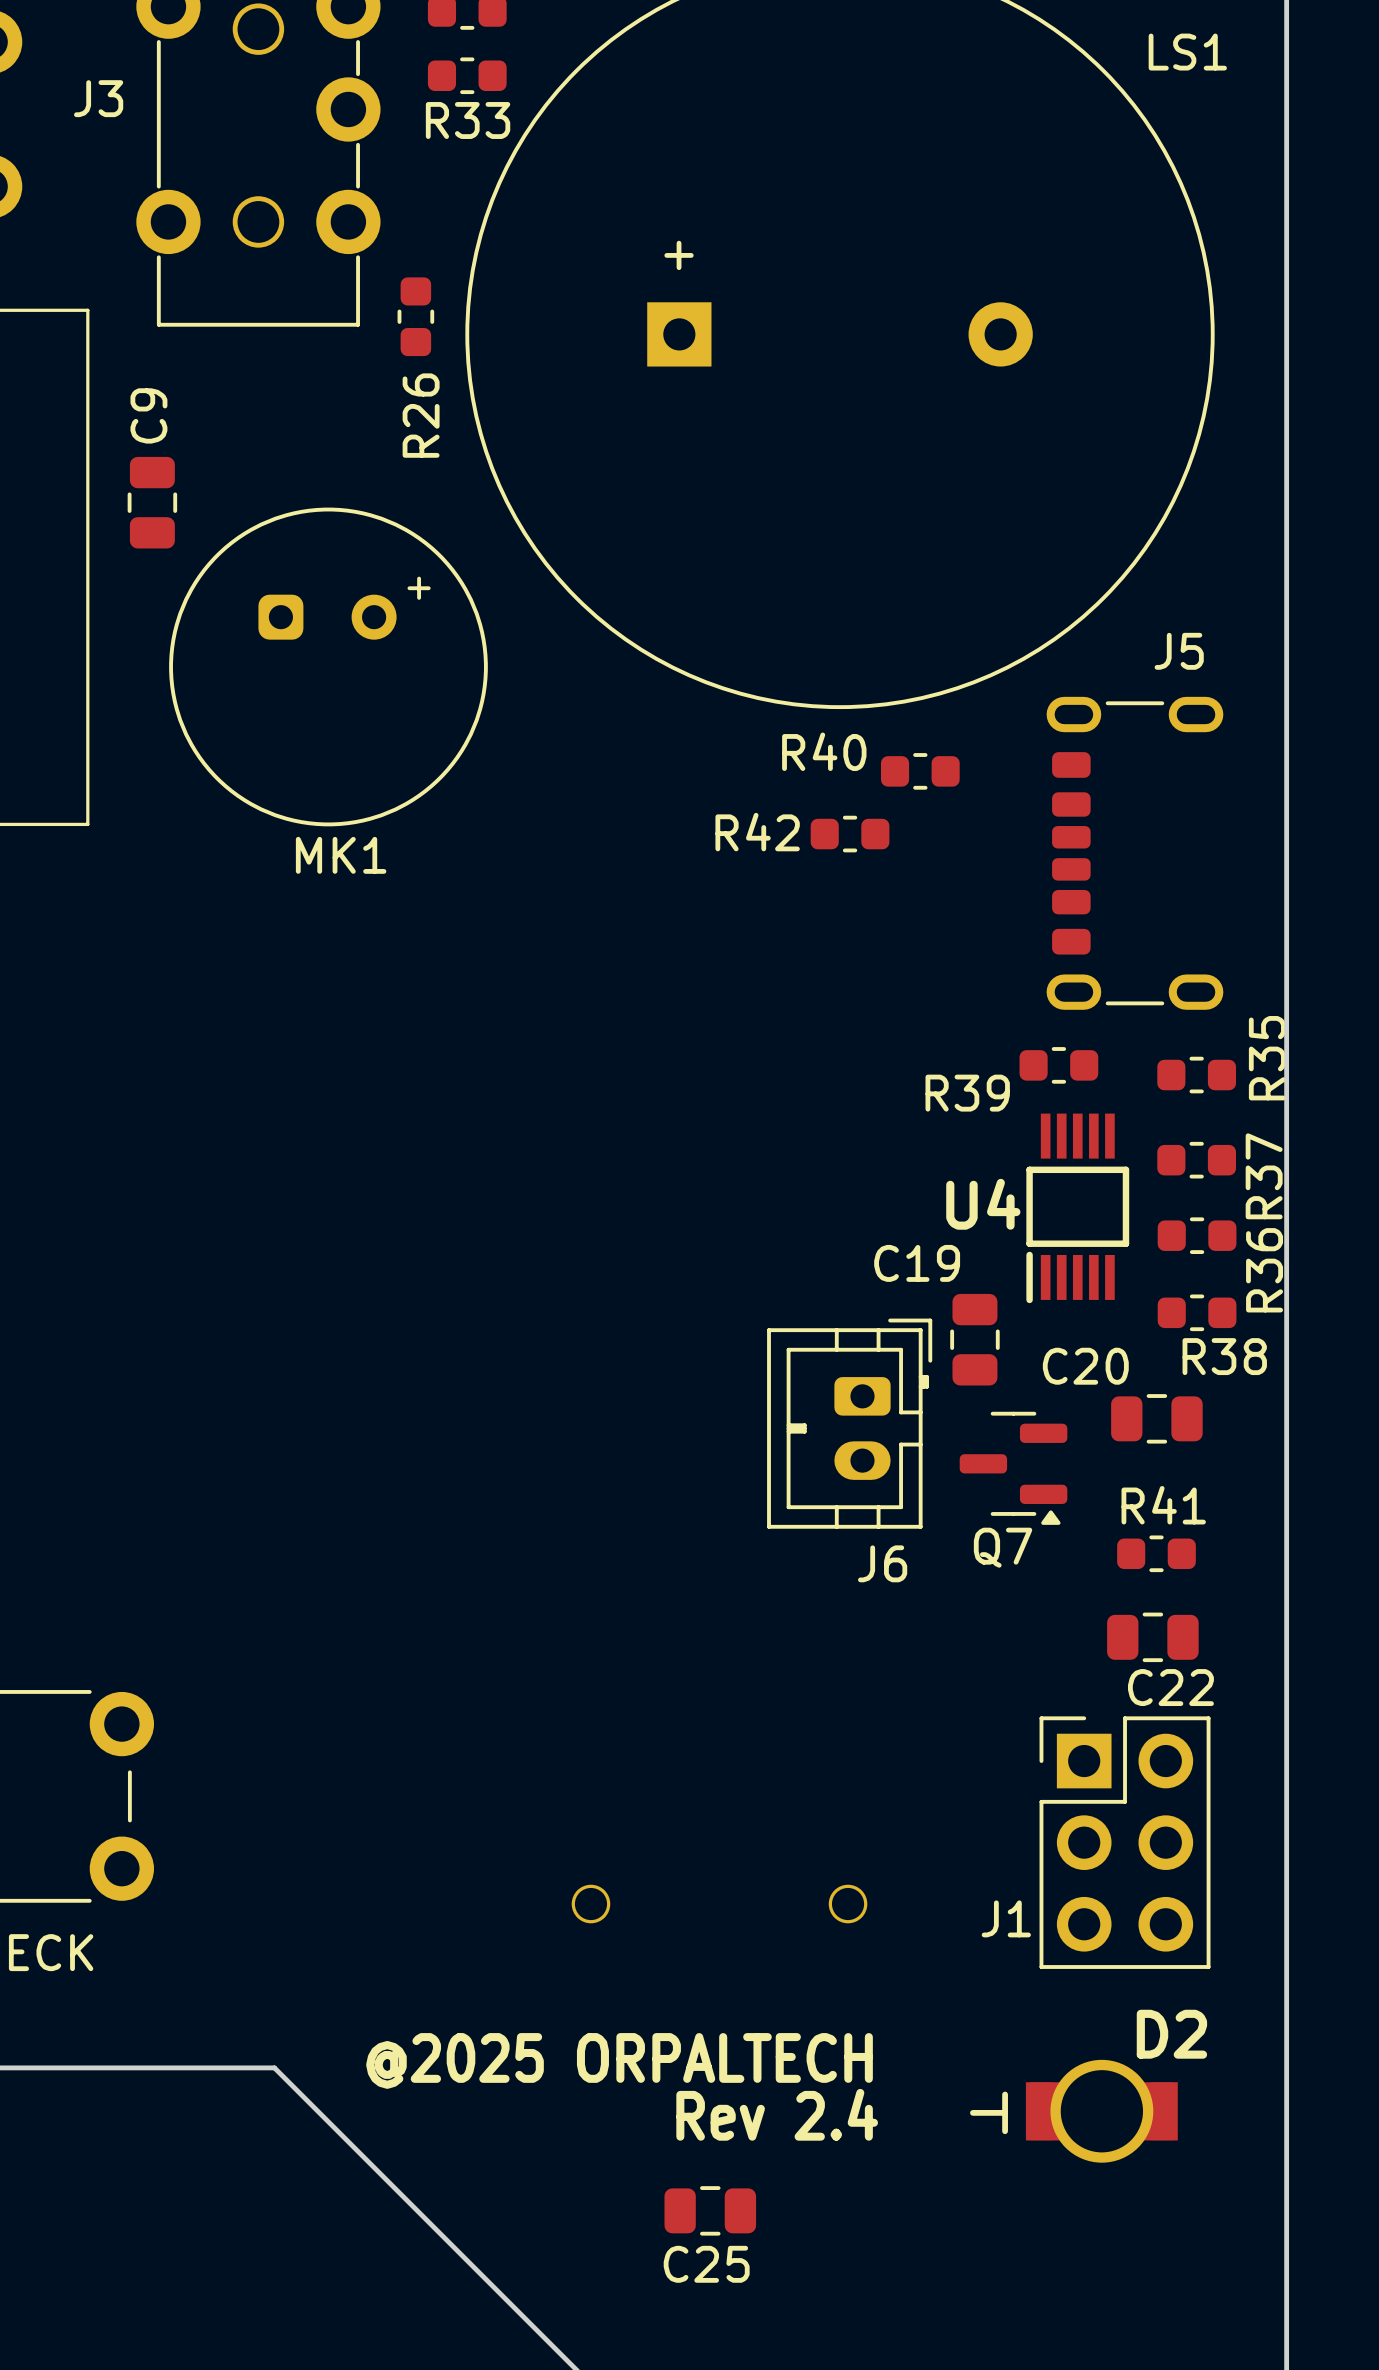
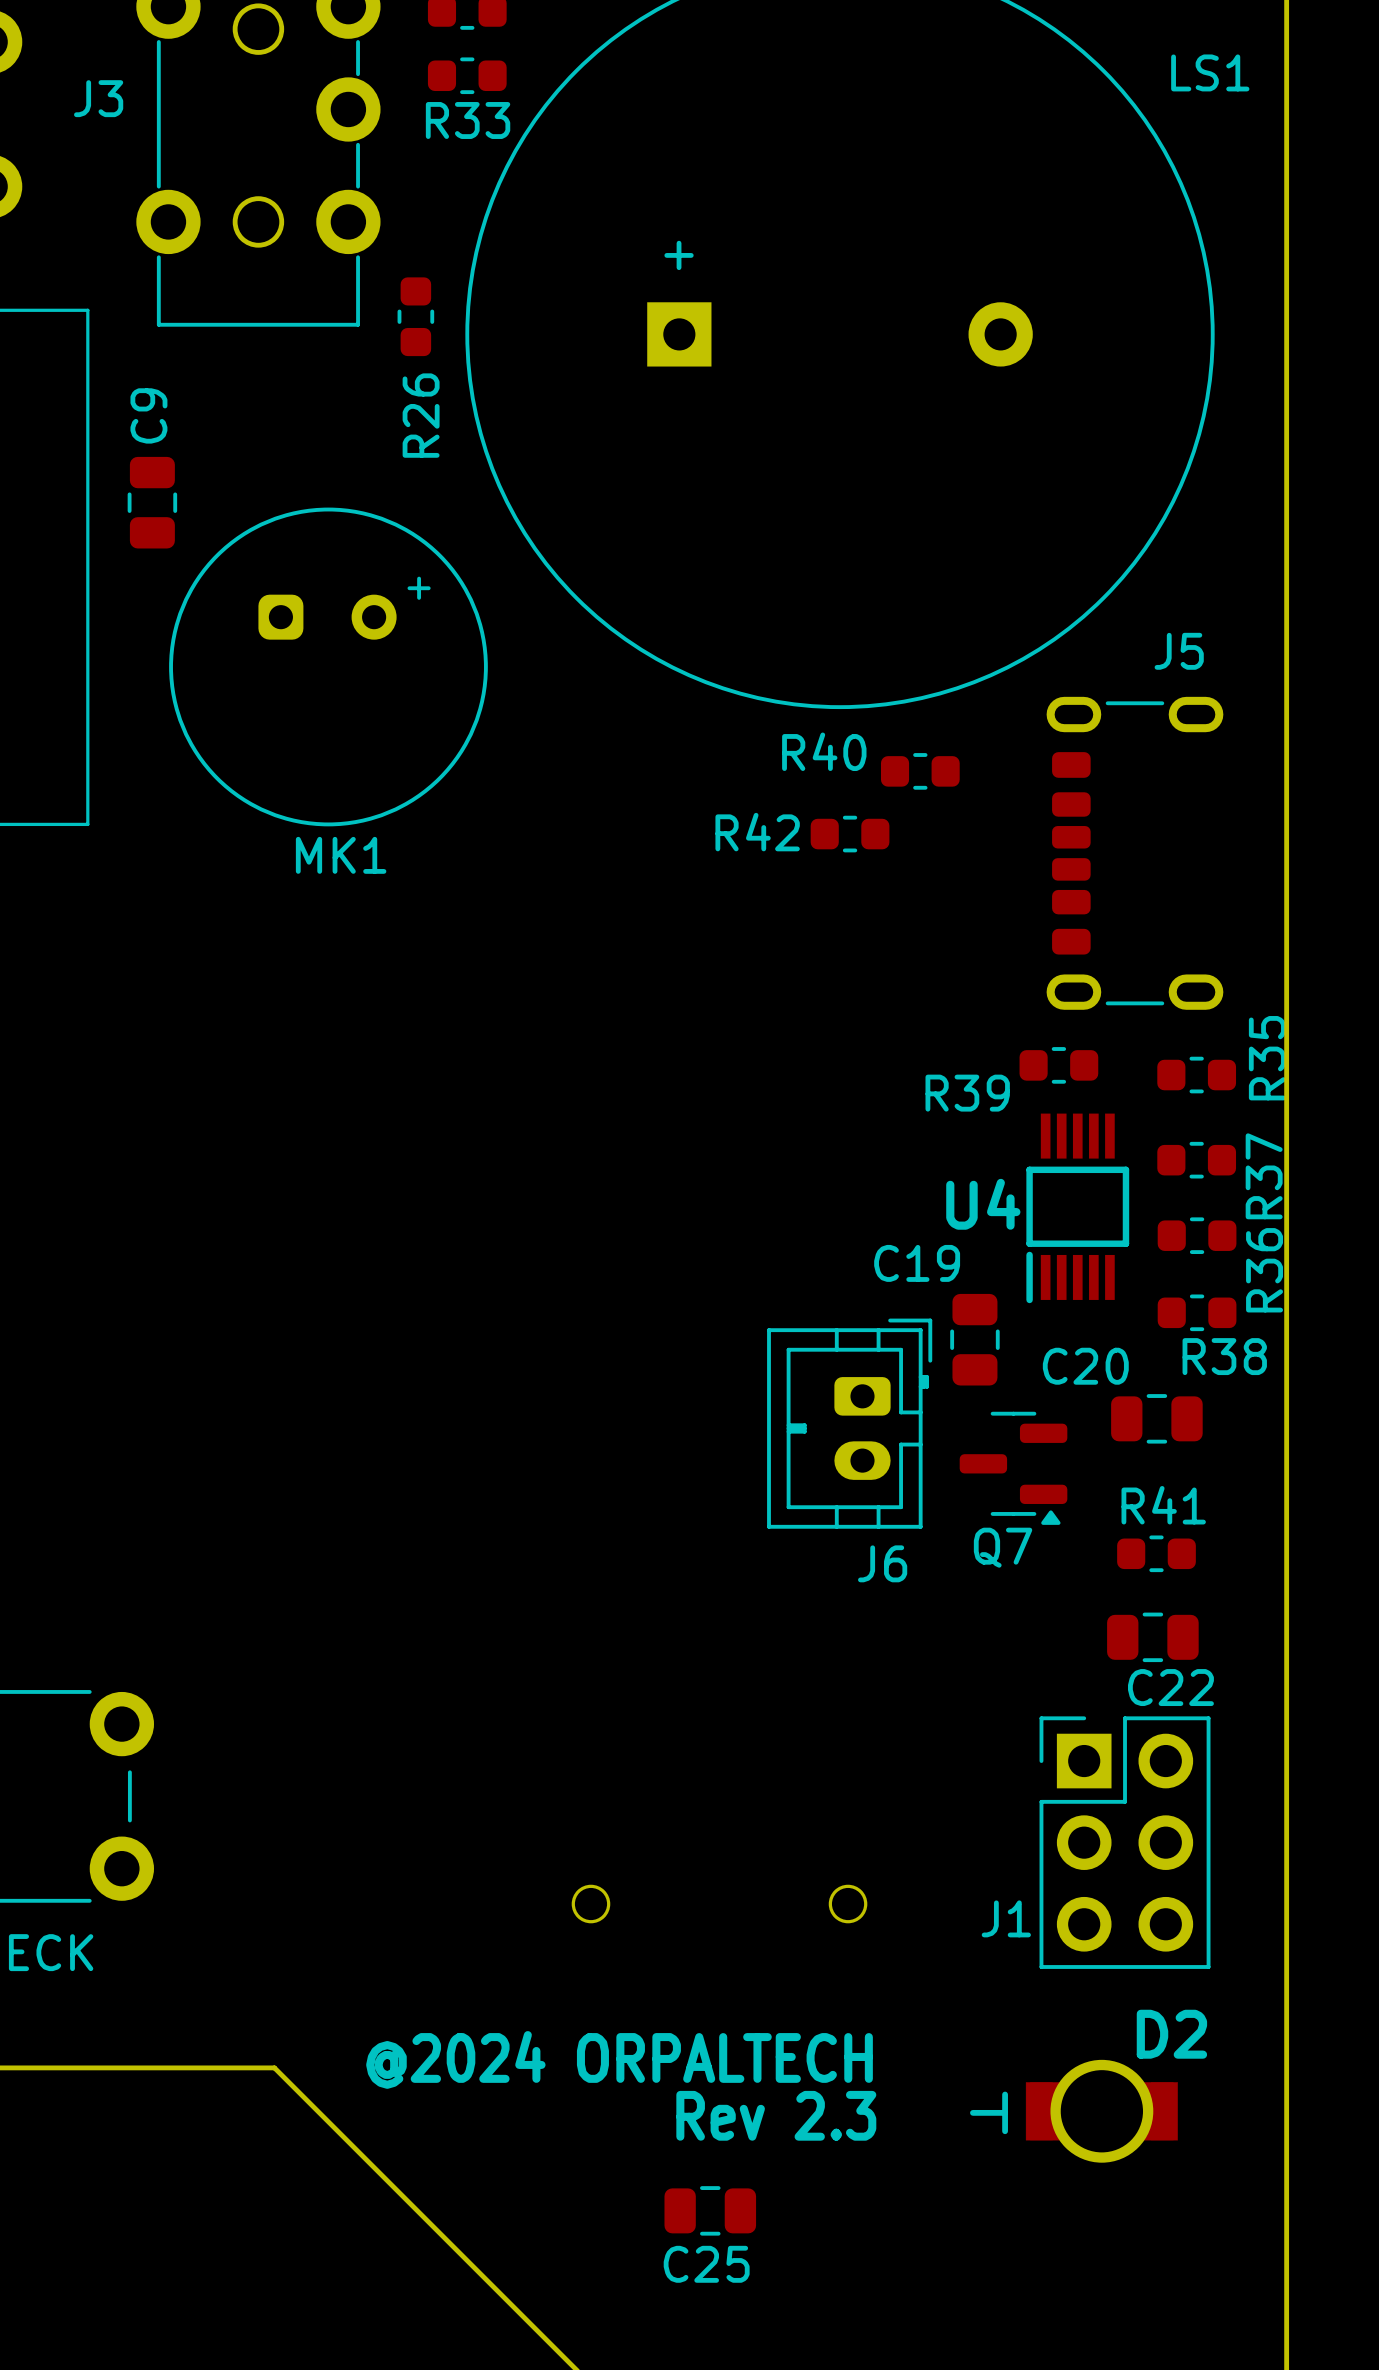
LS1 name position: LS1 (1187, 52) -> LS1 (1210, 72)
text: @2025 ORPALTECH (619, 2060) -> @2024 ORPALTECH (619, 2059)
text: Rev 2.4 (777, 2114) -> Rev 2.3 (776, 2115)

